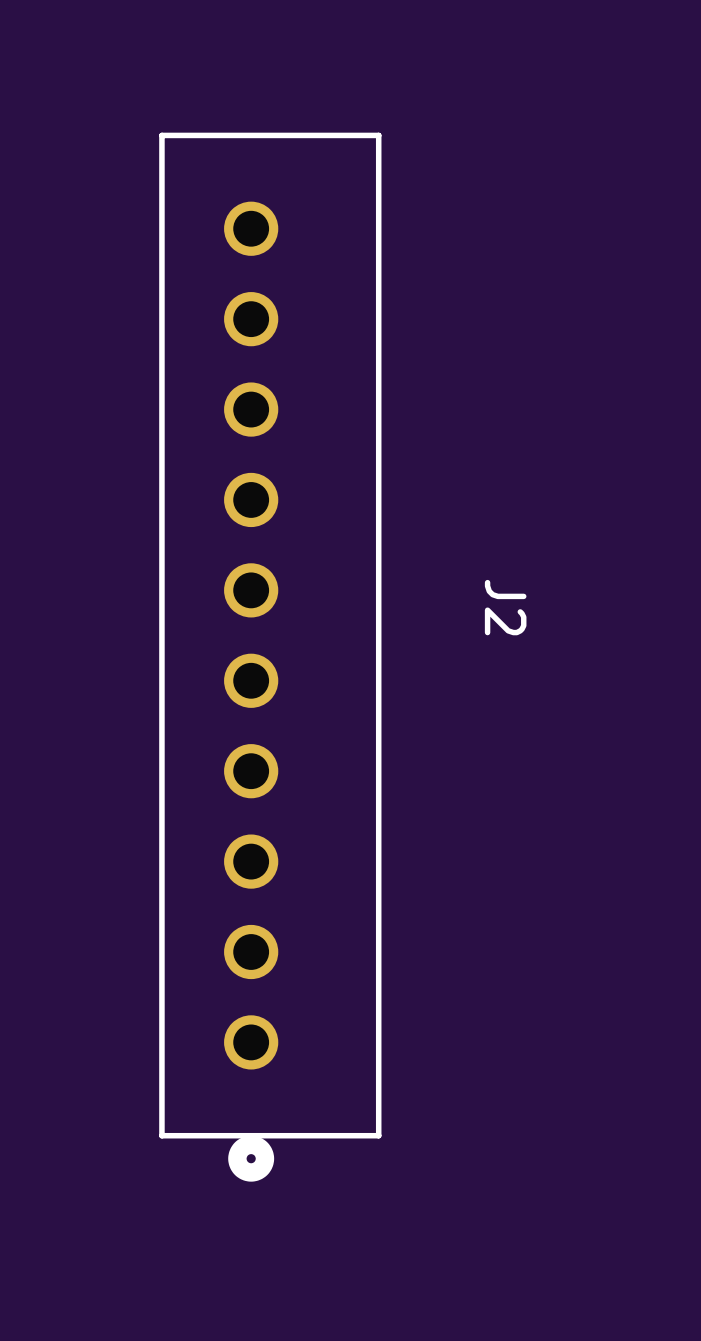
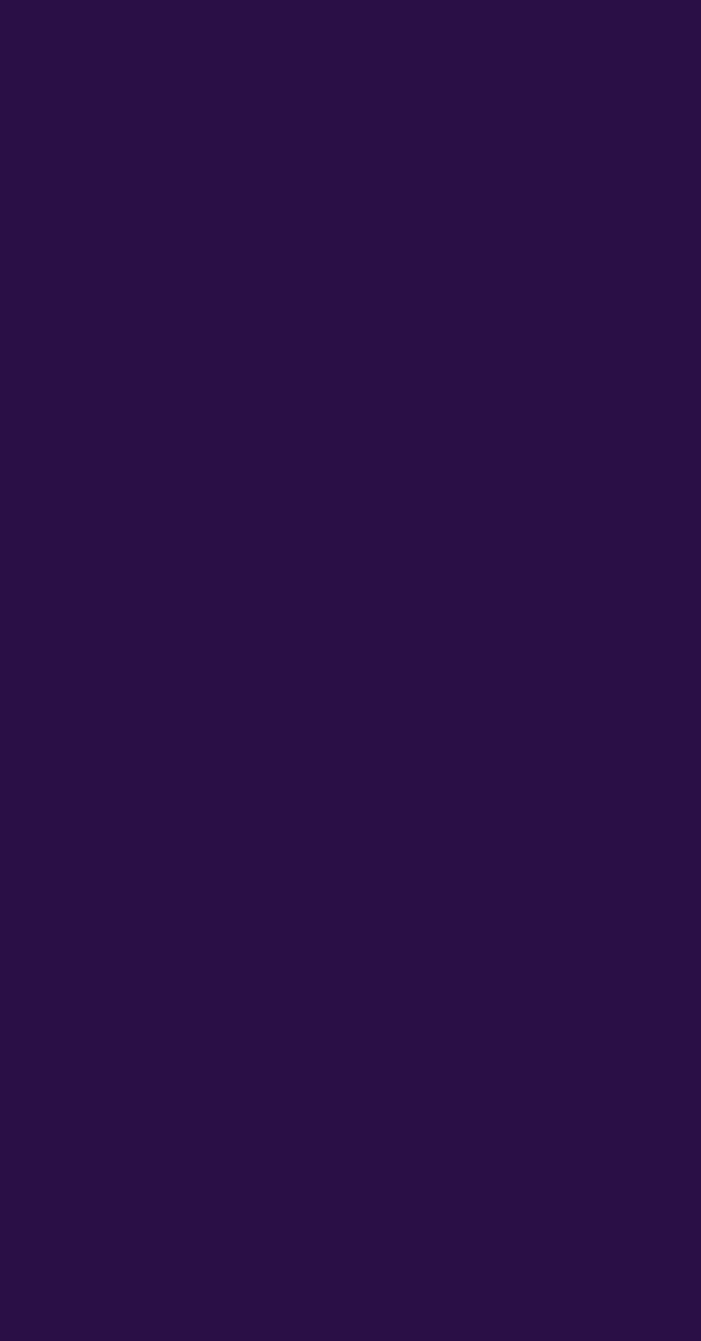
J2: (270, 657) -> none

